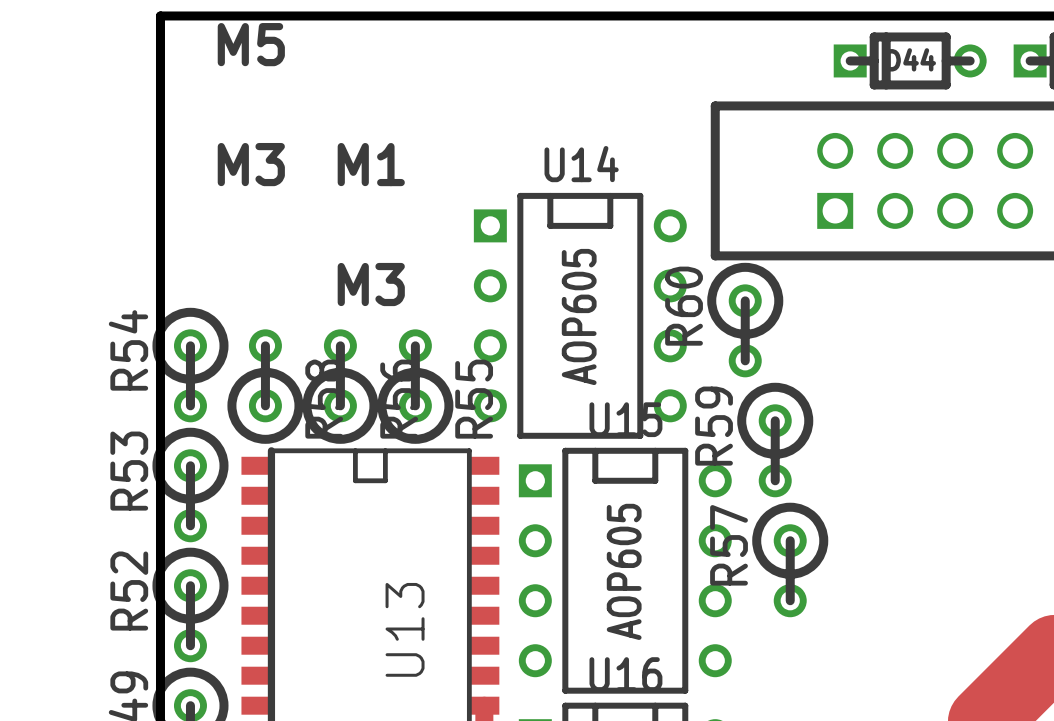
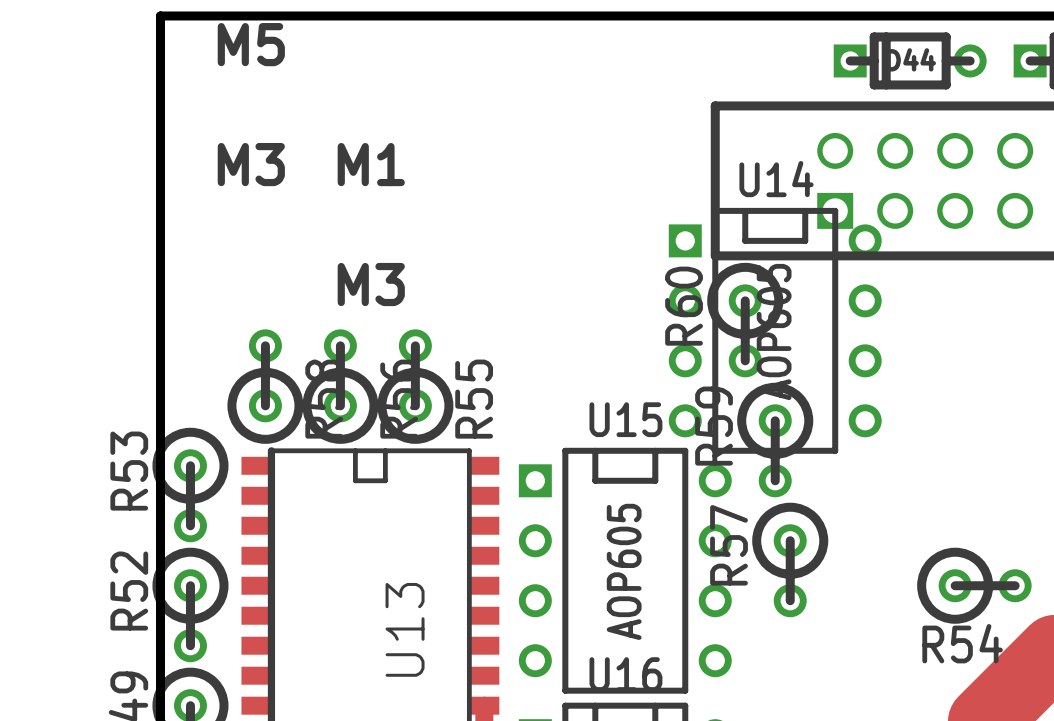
U14 position: (580, 315) -> (775, 330)
R54 rotation: 0° (190, 365) -> 90° counterclockwise (974, 585)
R54 position: (190, 365) -> (974, 585)

